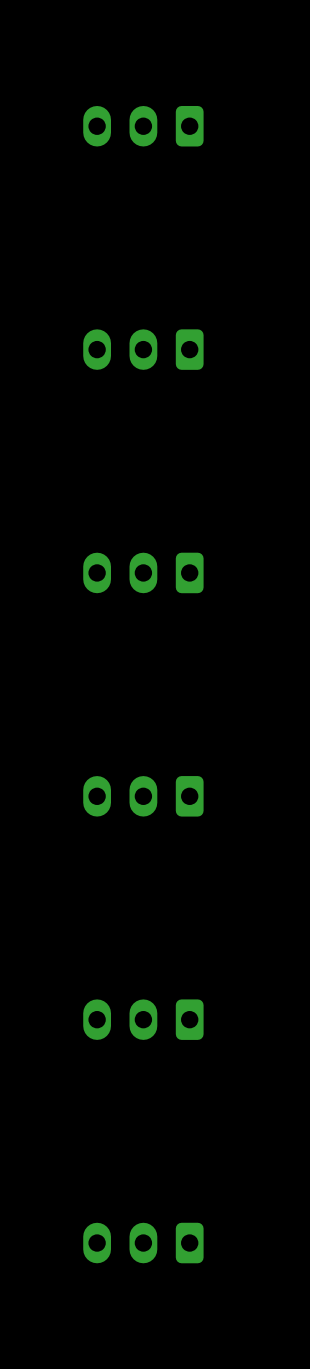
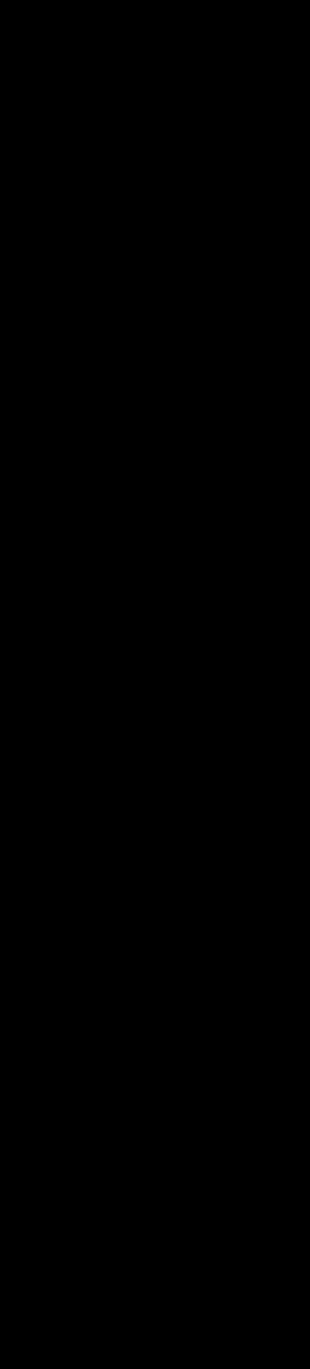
part: (143, 126) -> none
part: (143, 349) -> none
part: (143, 572) -> none
part: (143, 796) -> none
part: (143, 1019) -> none
part: (143, 1243) -> none

